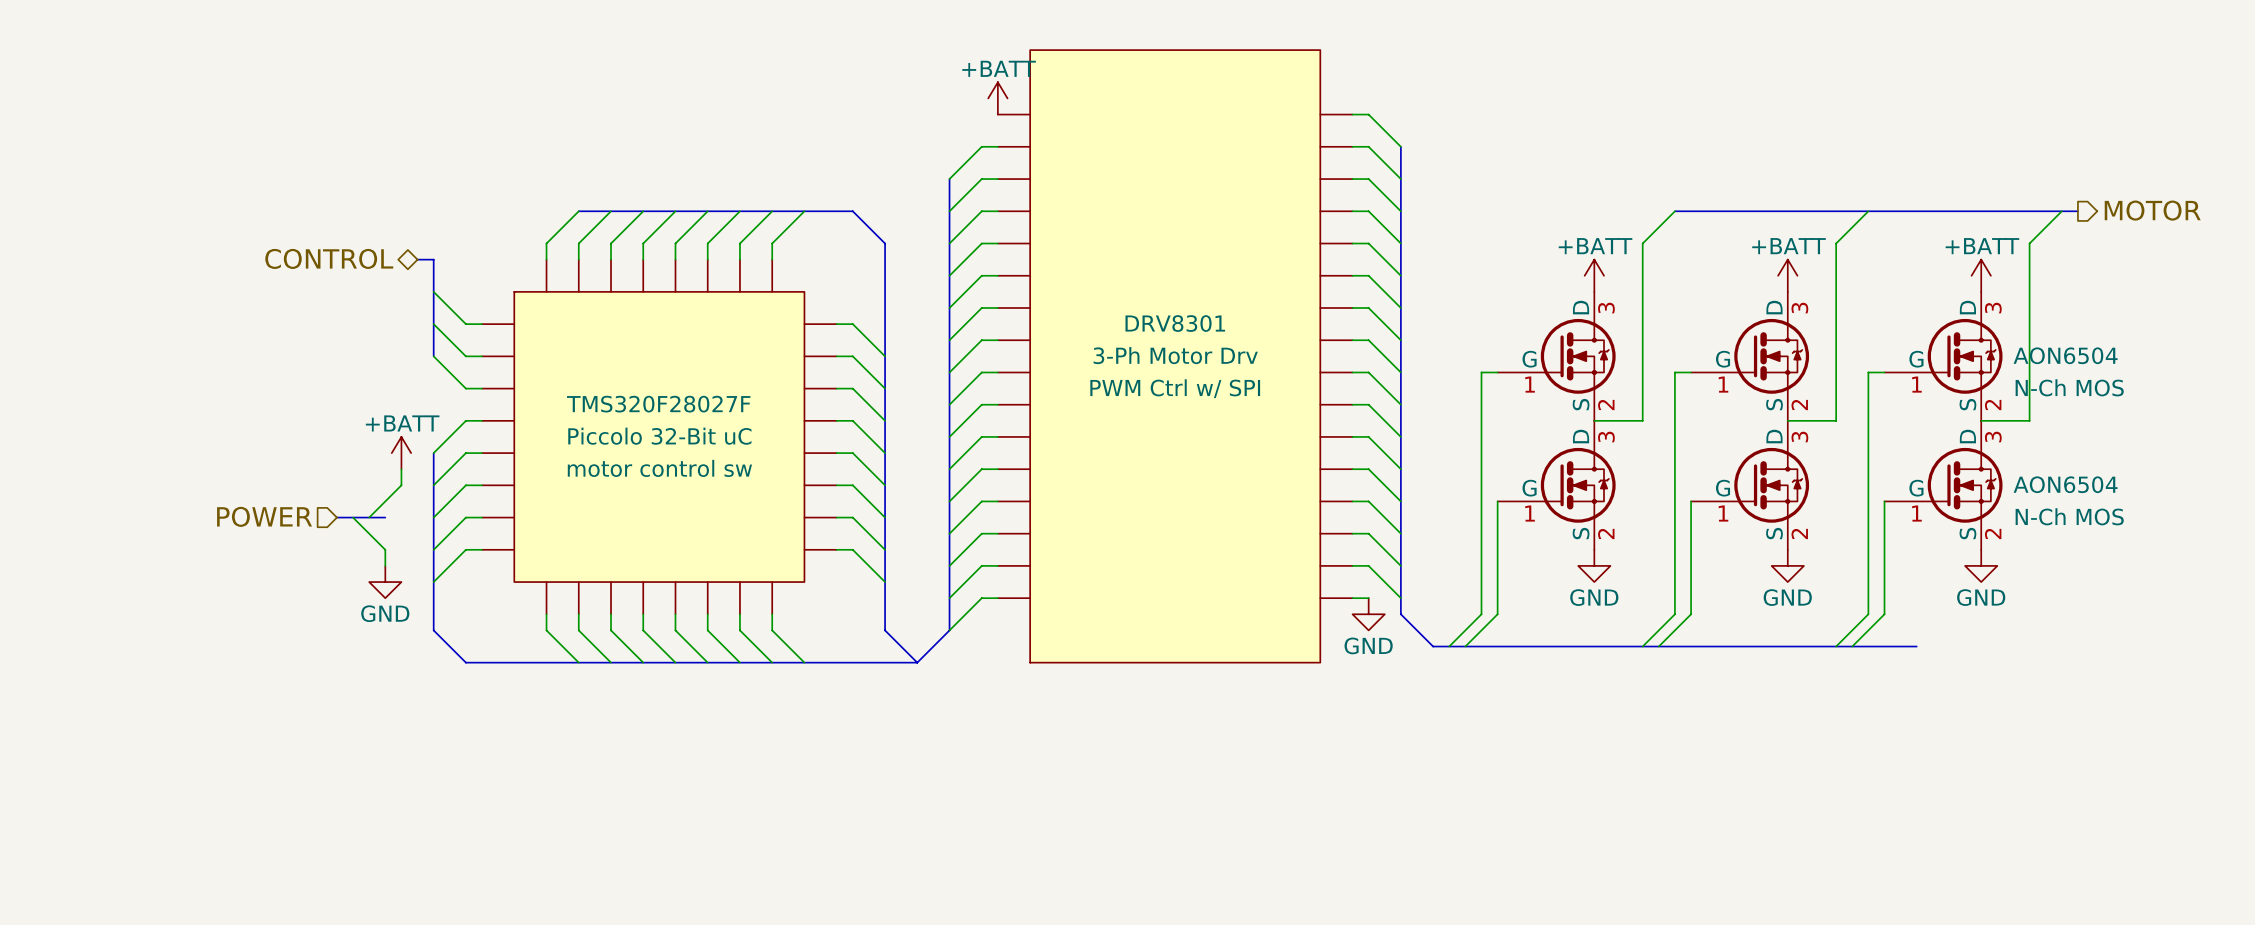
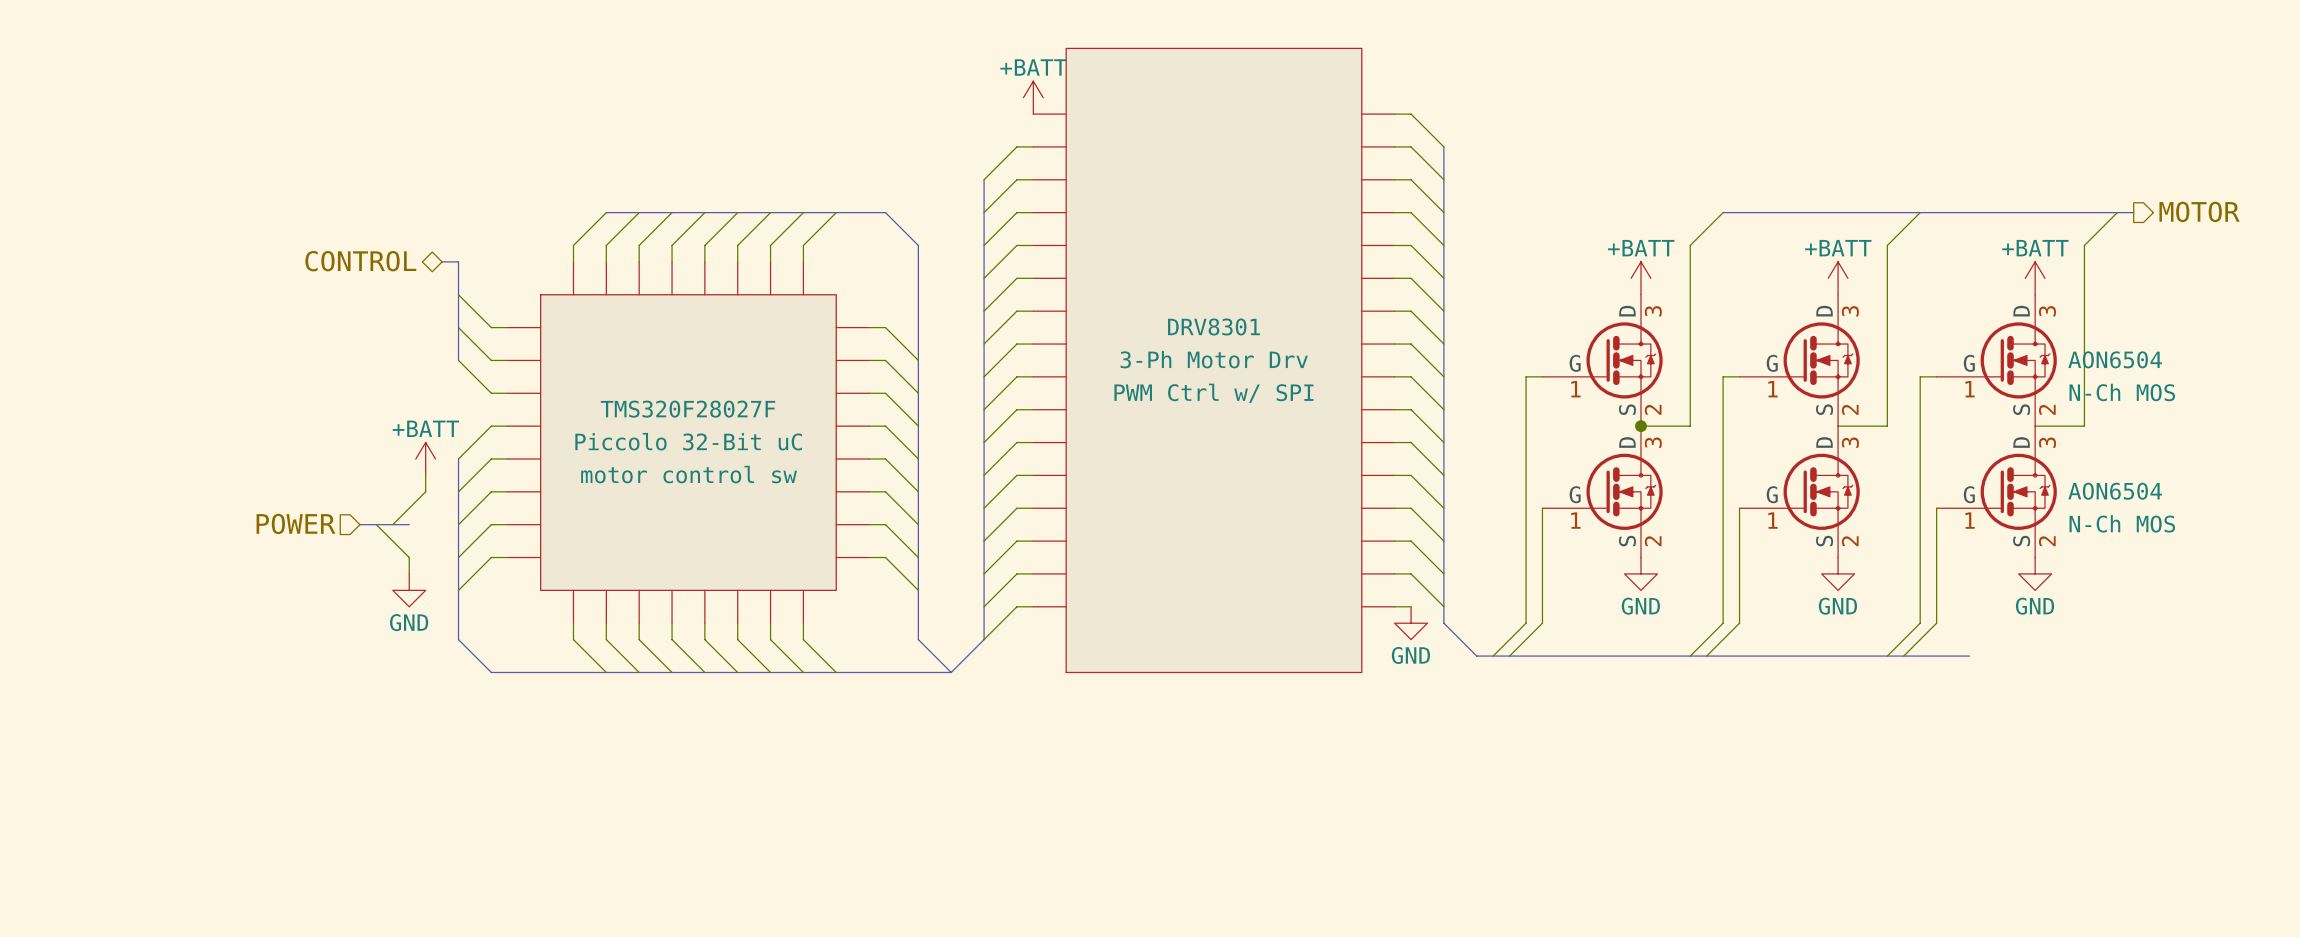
junction: none -> (1640, 426)

